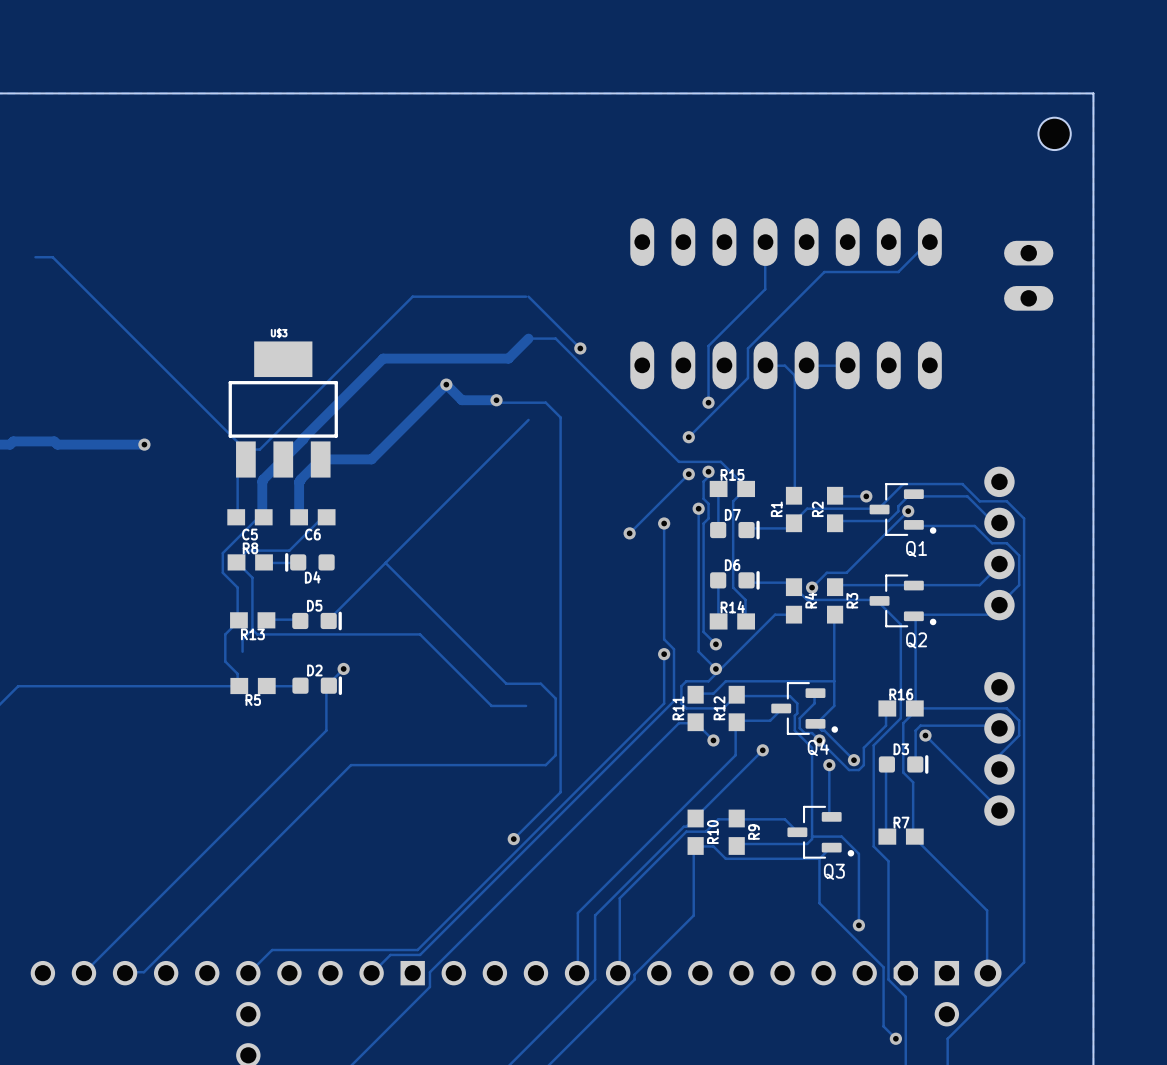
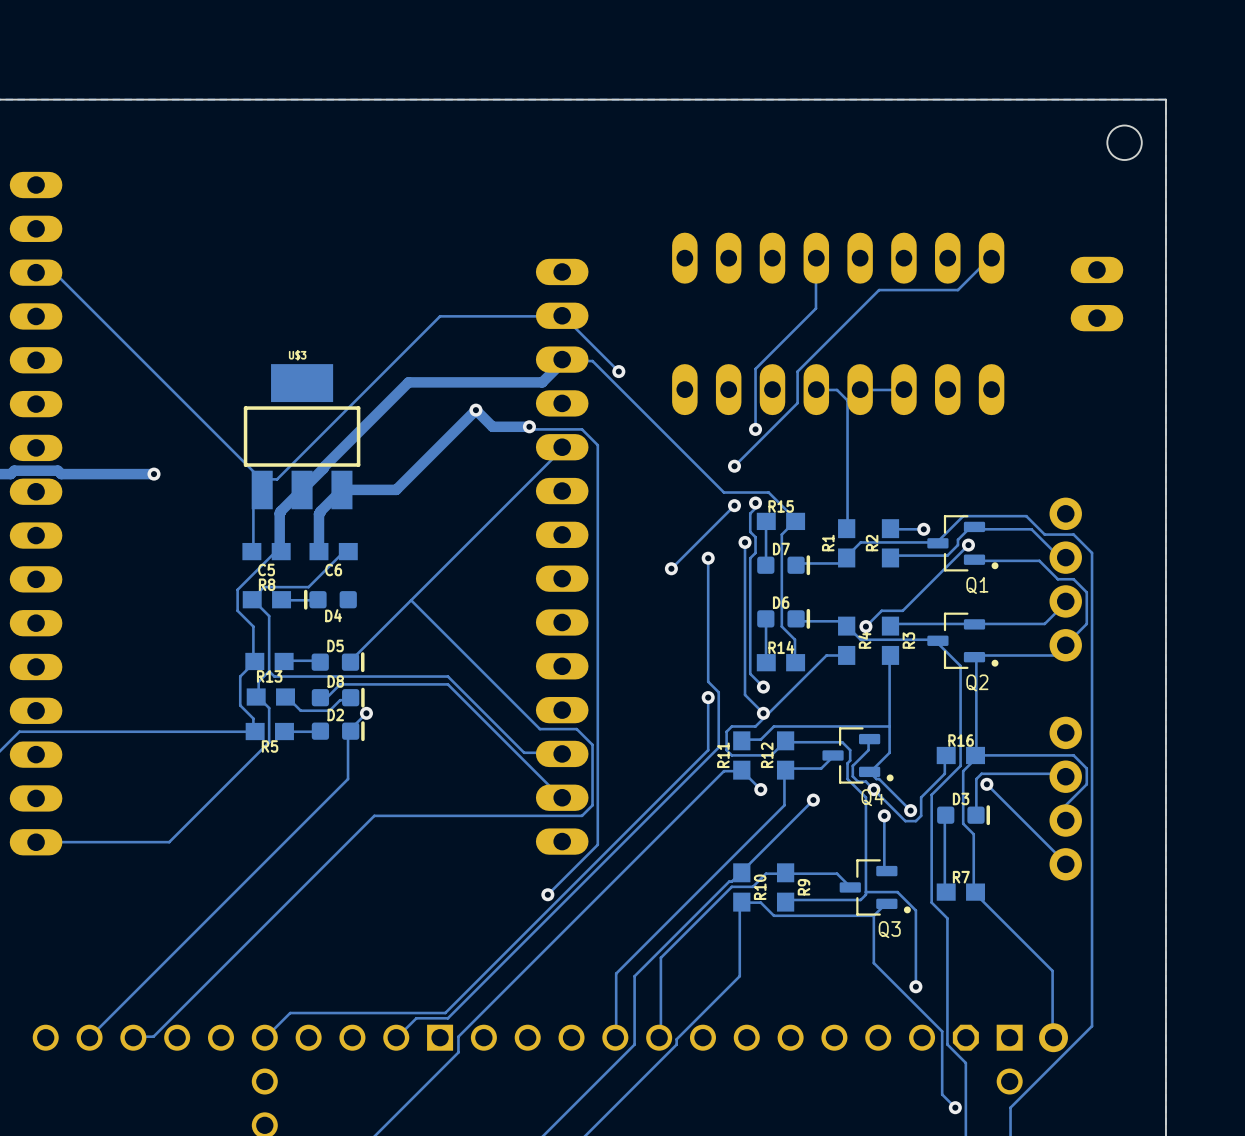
part: none -> (36, 513)
part: none -> (562, 556)
track: none -> (258, 694) (256, 697) (269, 708) (269, 742) (169, 842) (36, 842)
part: none -> (270, 697)
track: none -> (285, 697) (300, 710) (329, 710) (340, 700) (348, 700) (350, 697)
track: none -> (320, 697) (327, 697) (340, 684) (447, 684) (562, 797)
D8: none -> (338, 697)

